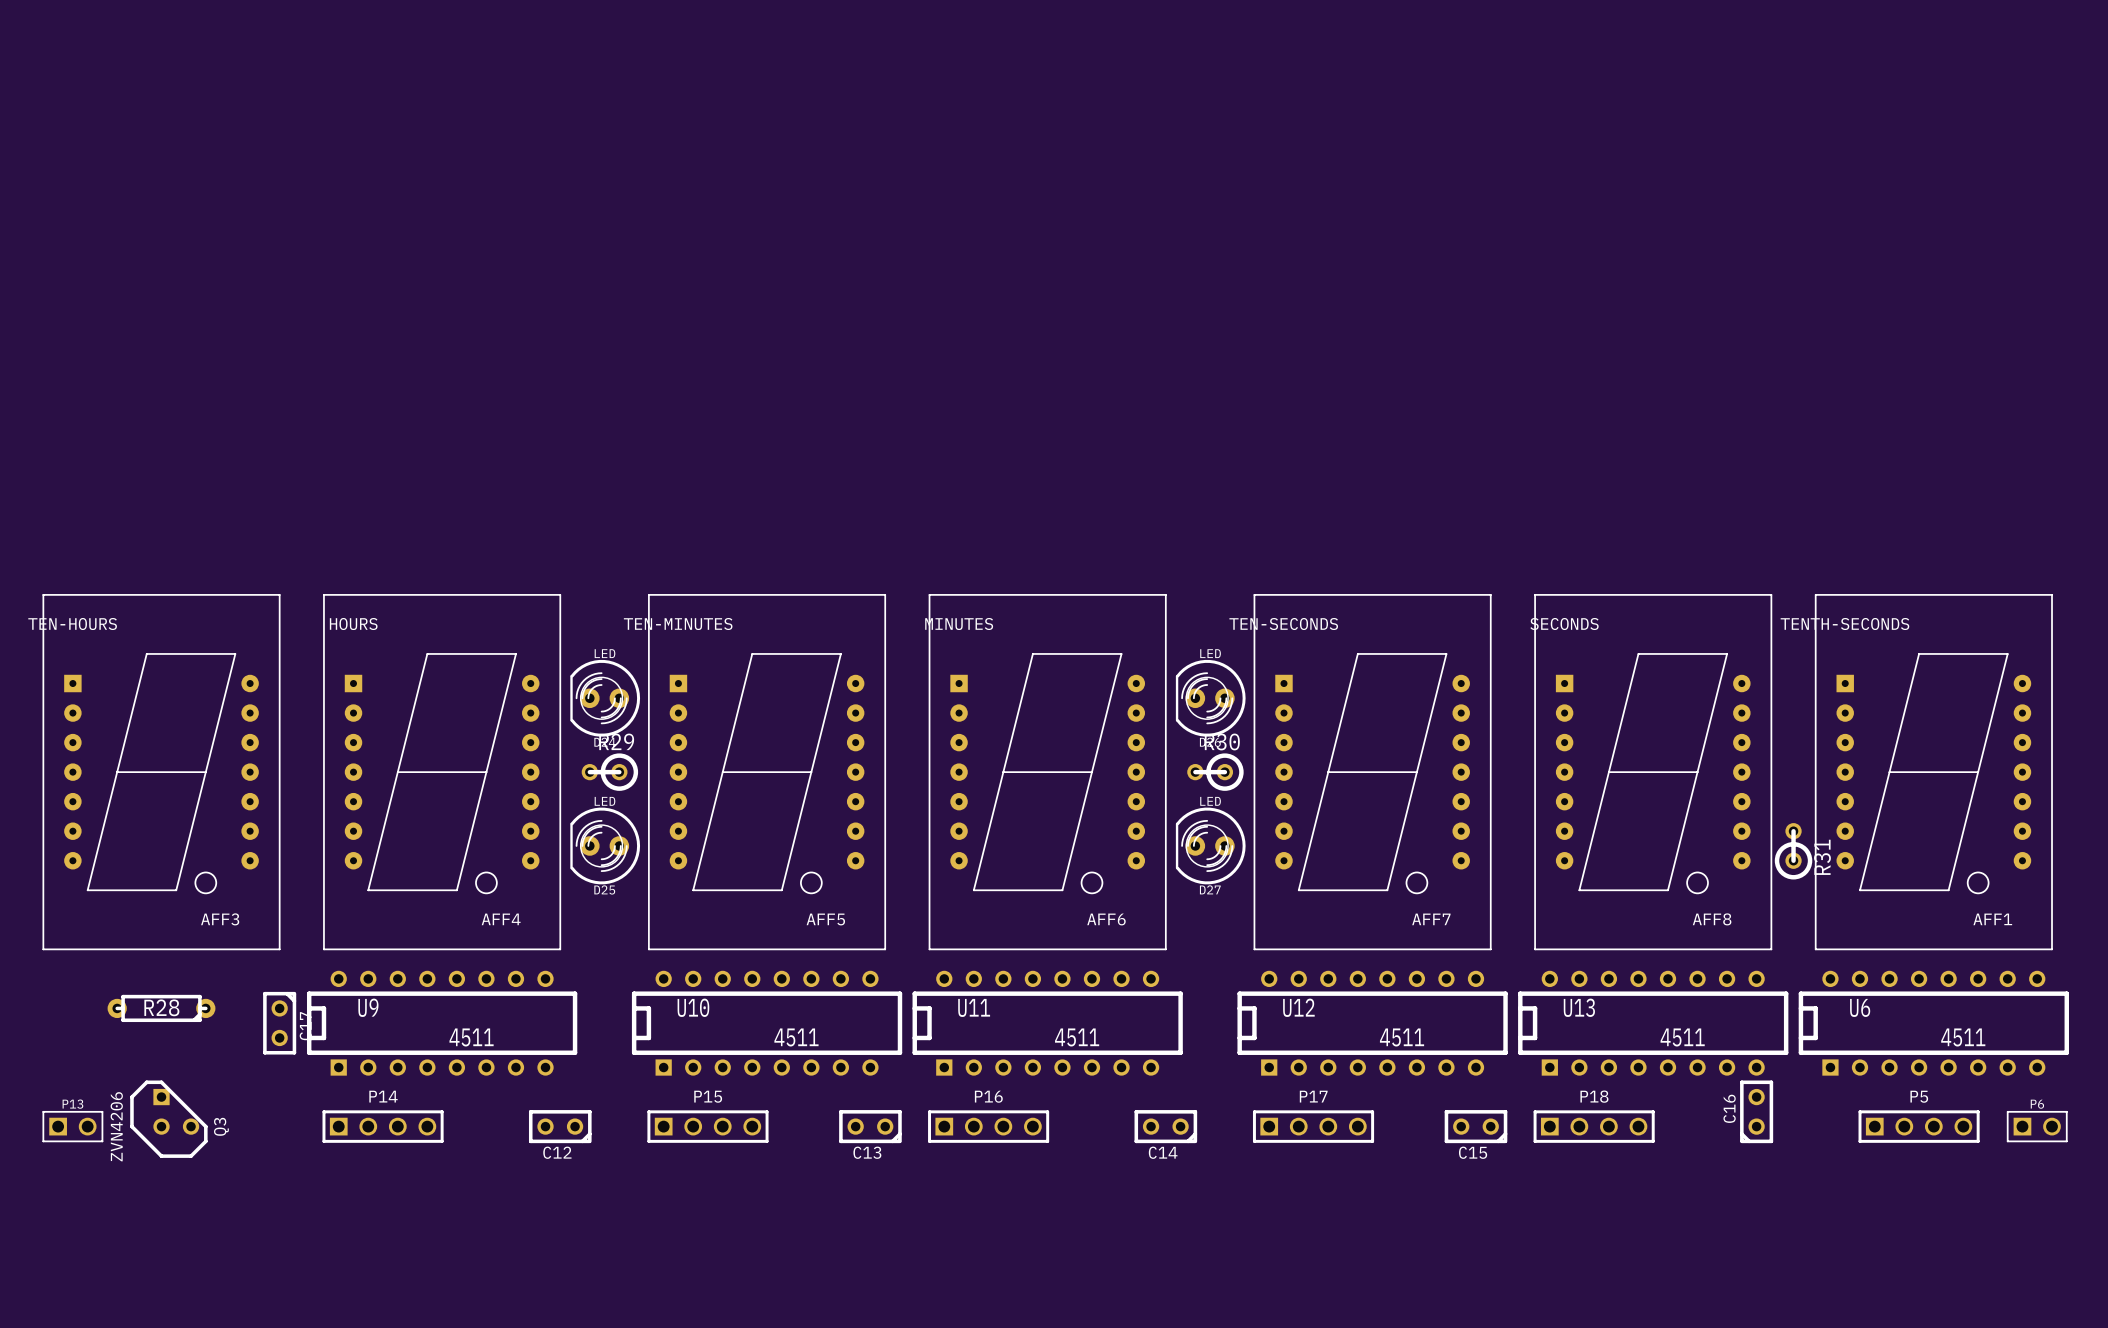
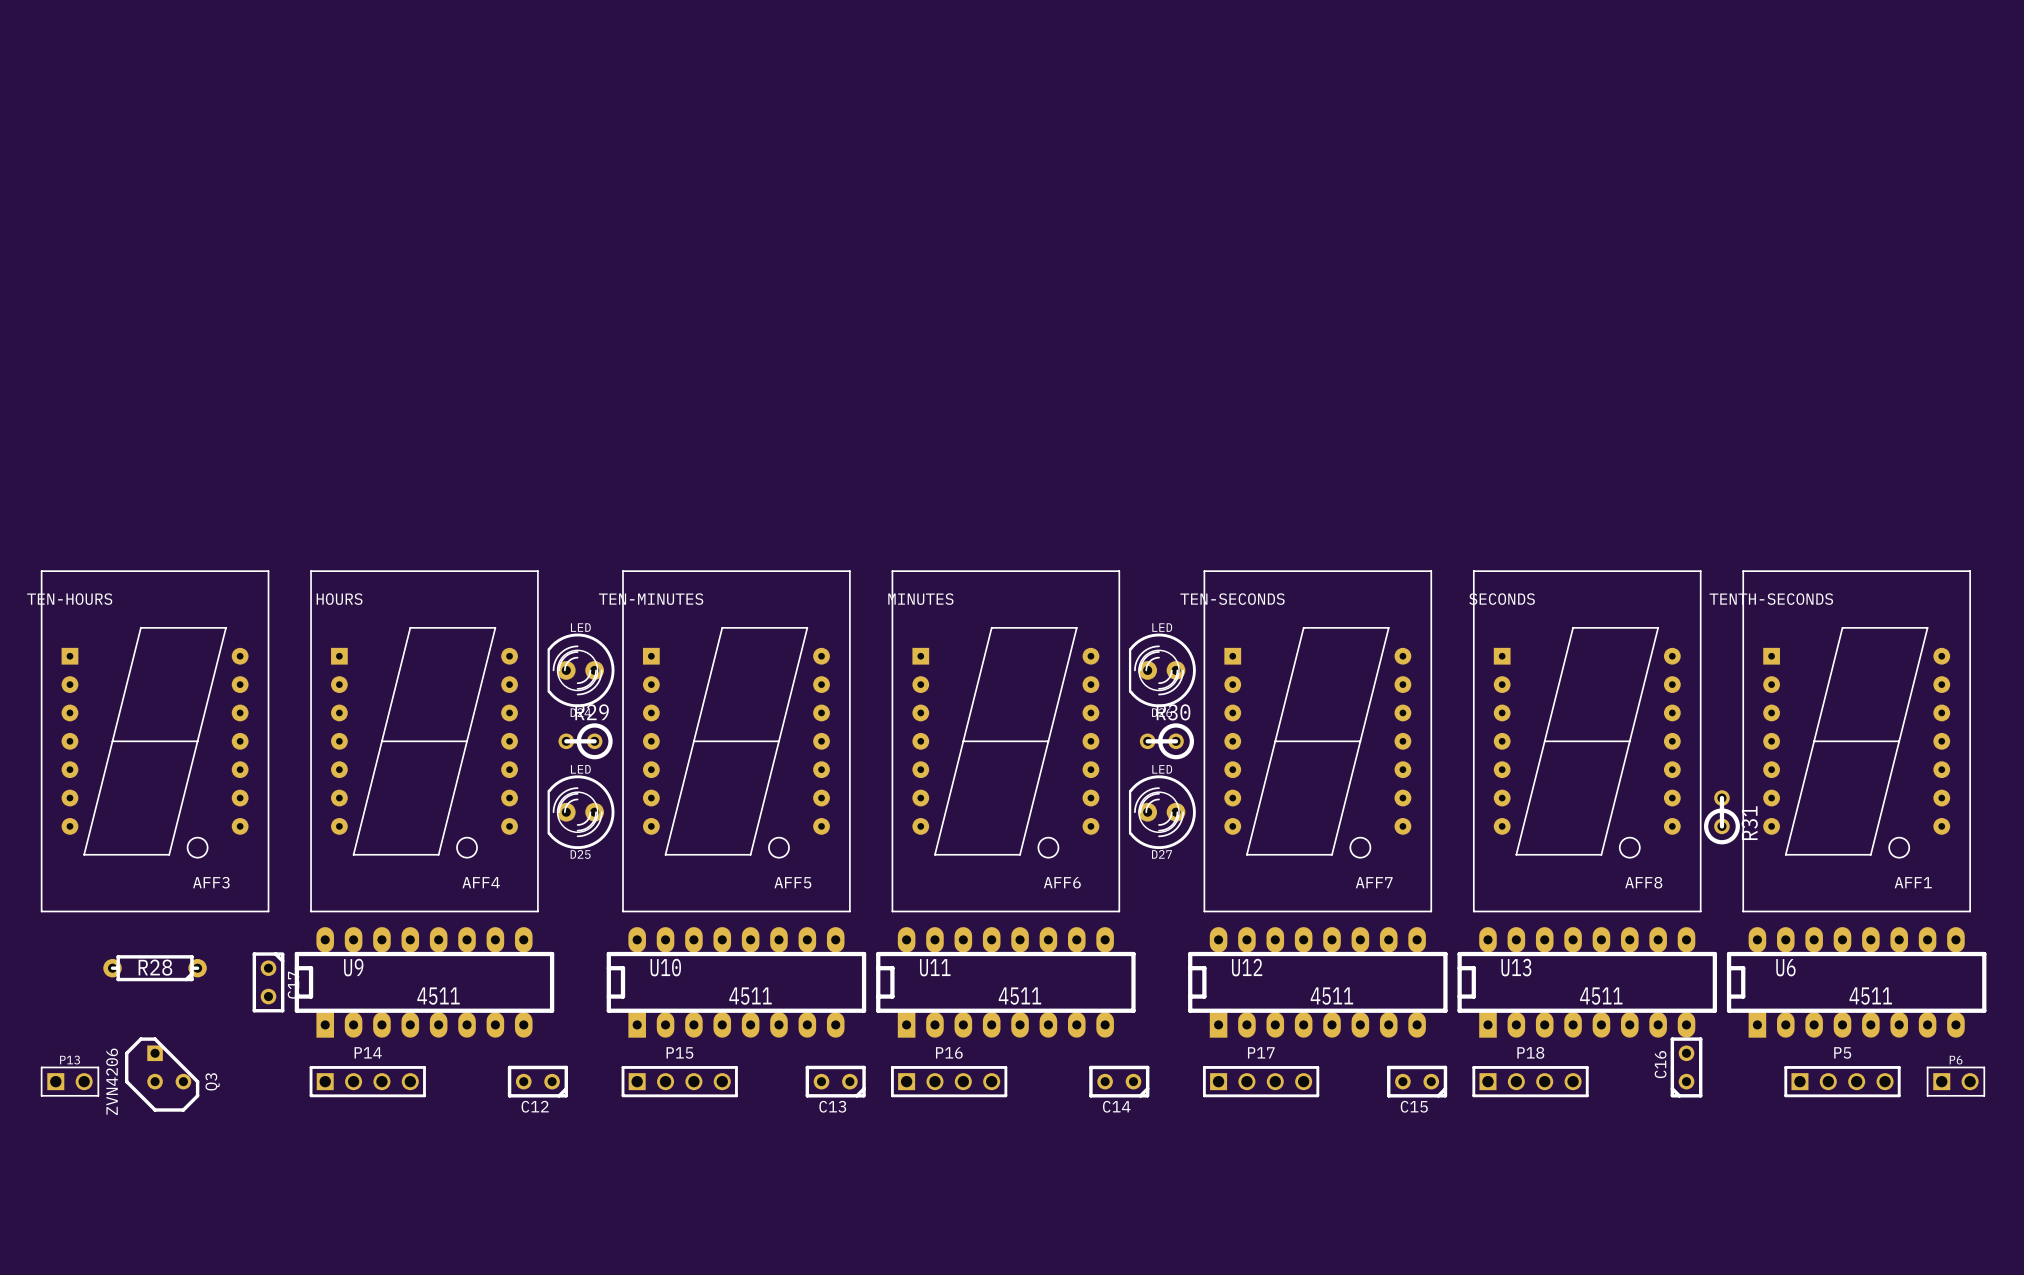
U9 footprint: [306, 970, 578, 1076] -> [294, 927, 555, 1038]
U10 footprint: [631, 970, 903, 1076] -> [606, 927, 867, 1038]
U11 footprint: [912, 970, 1183, 1076] -> [876, 927, 1136, 1038]
U12 footprint: [1237, 970, 1508, 1076] -> [1188, 927, 1448, 1038]
U13 footprint: [1518, 970, 1789, 1076] -> [1457, 927, 1718, 1038]
U6 footprint: [1798, 970, 2069, 1076] -> [1726, 927, 1987, 1038]

